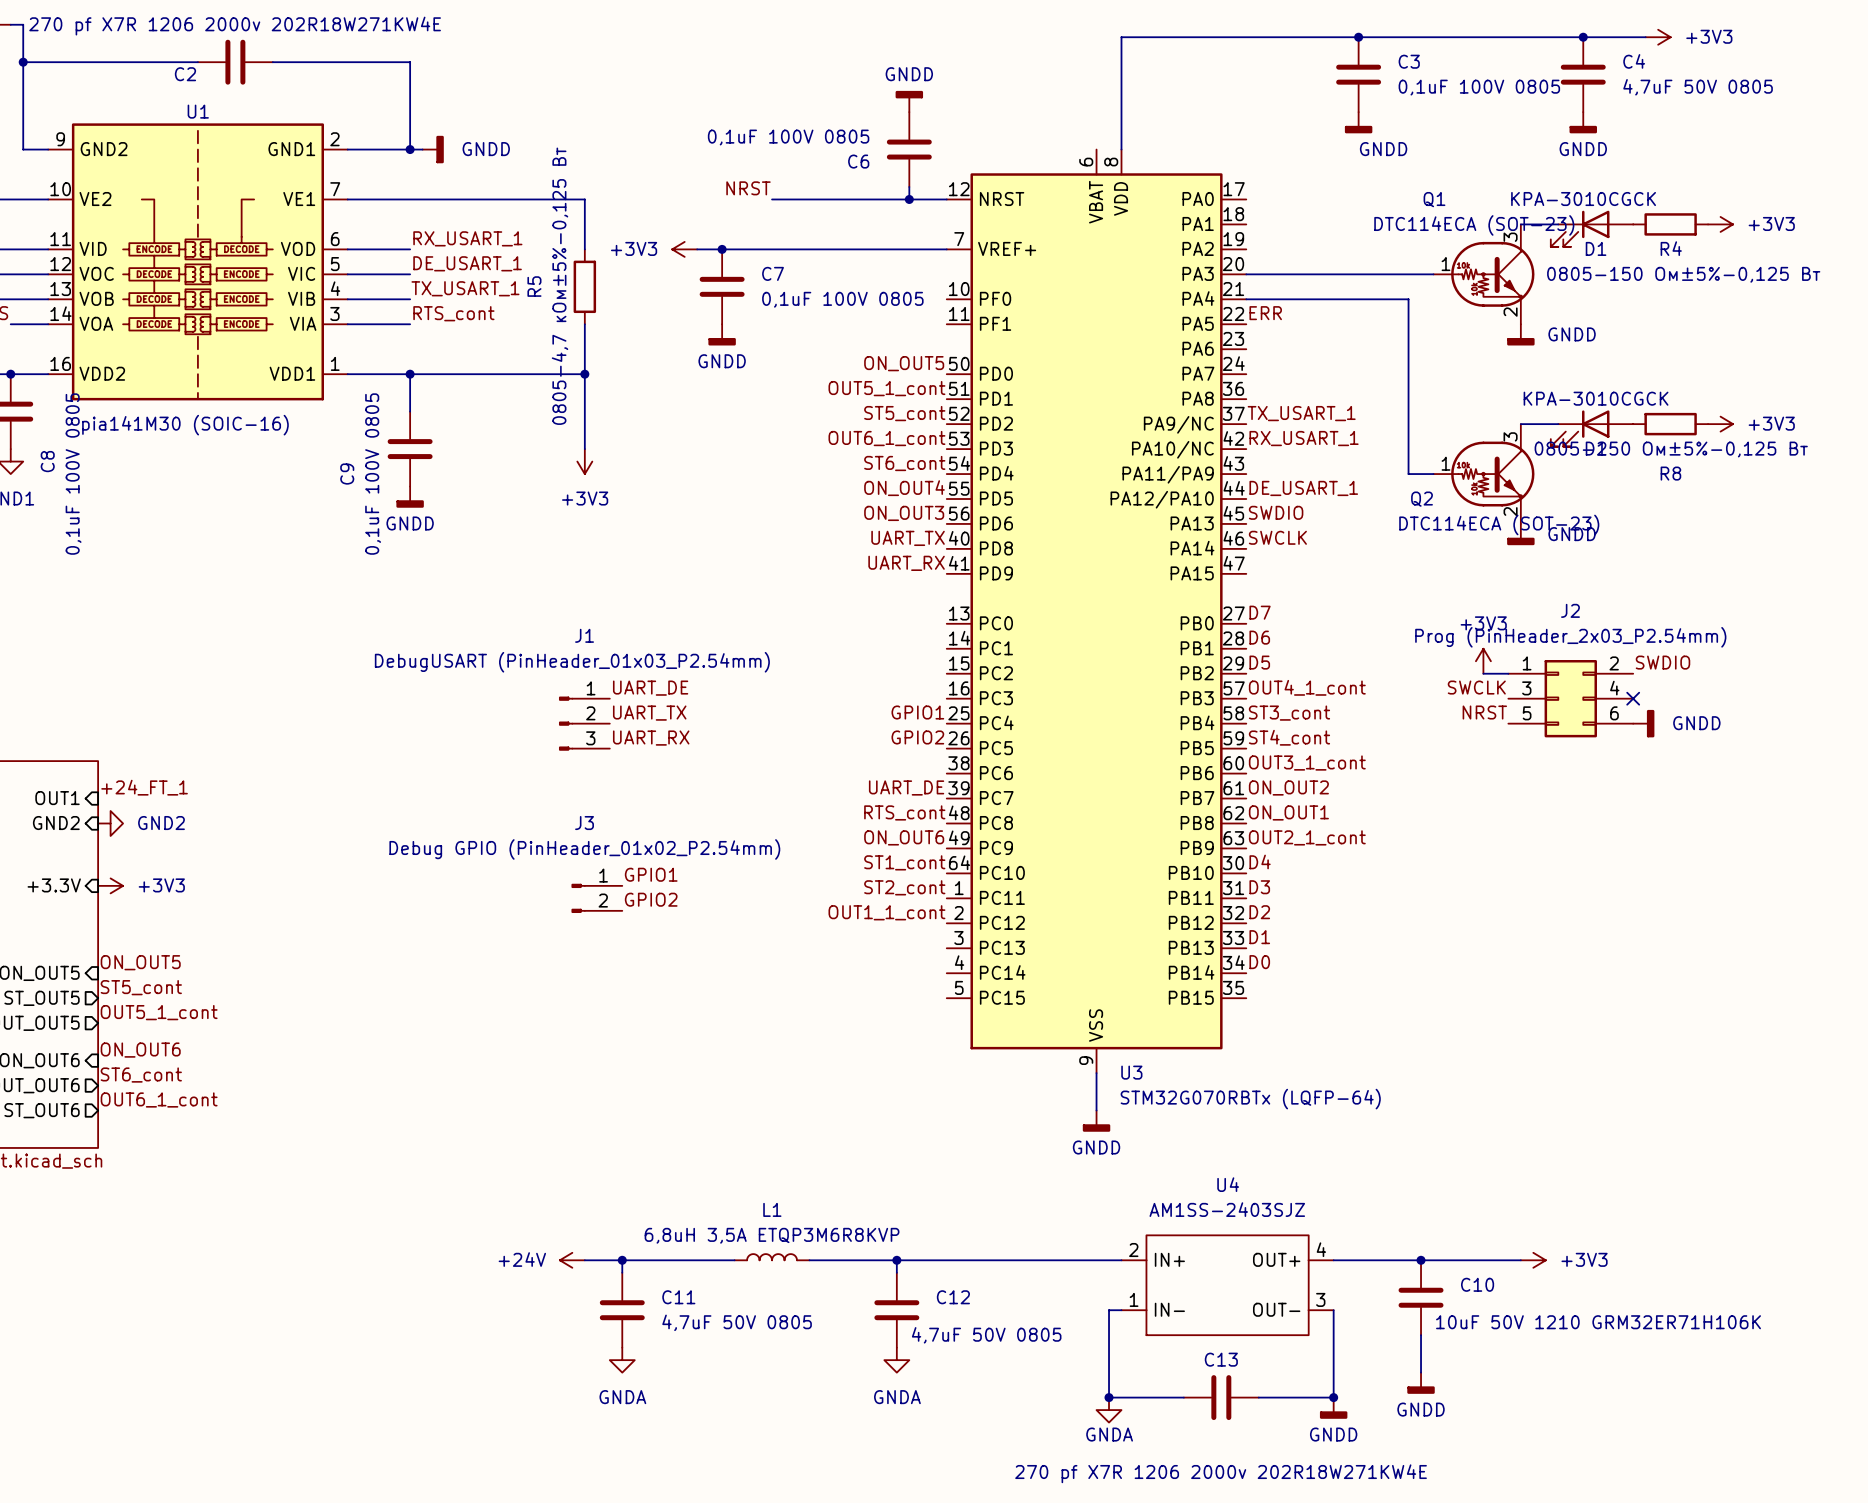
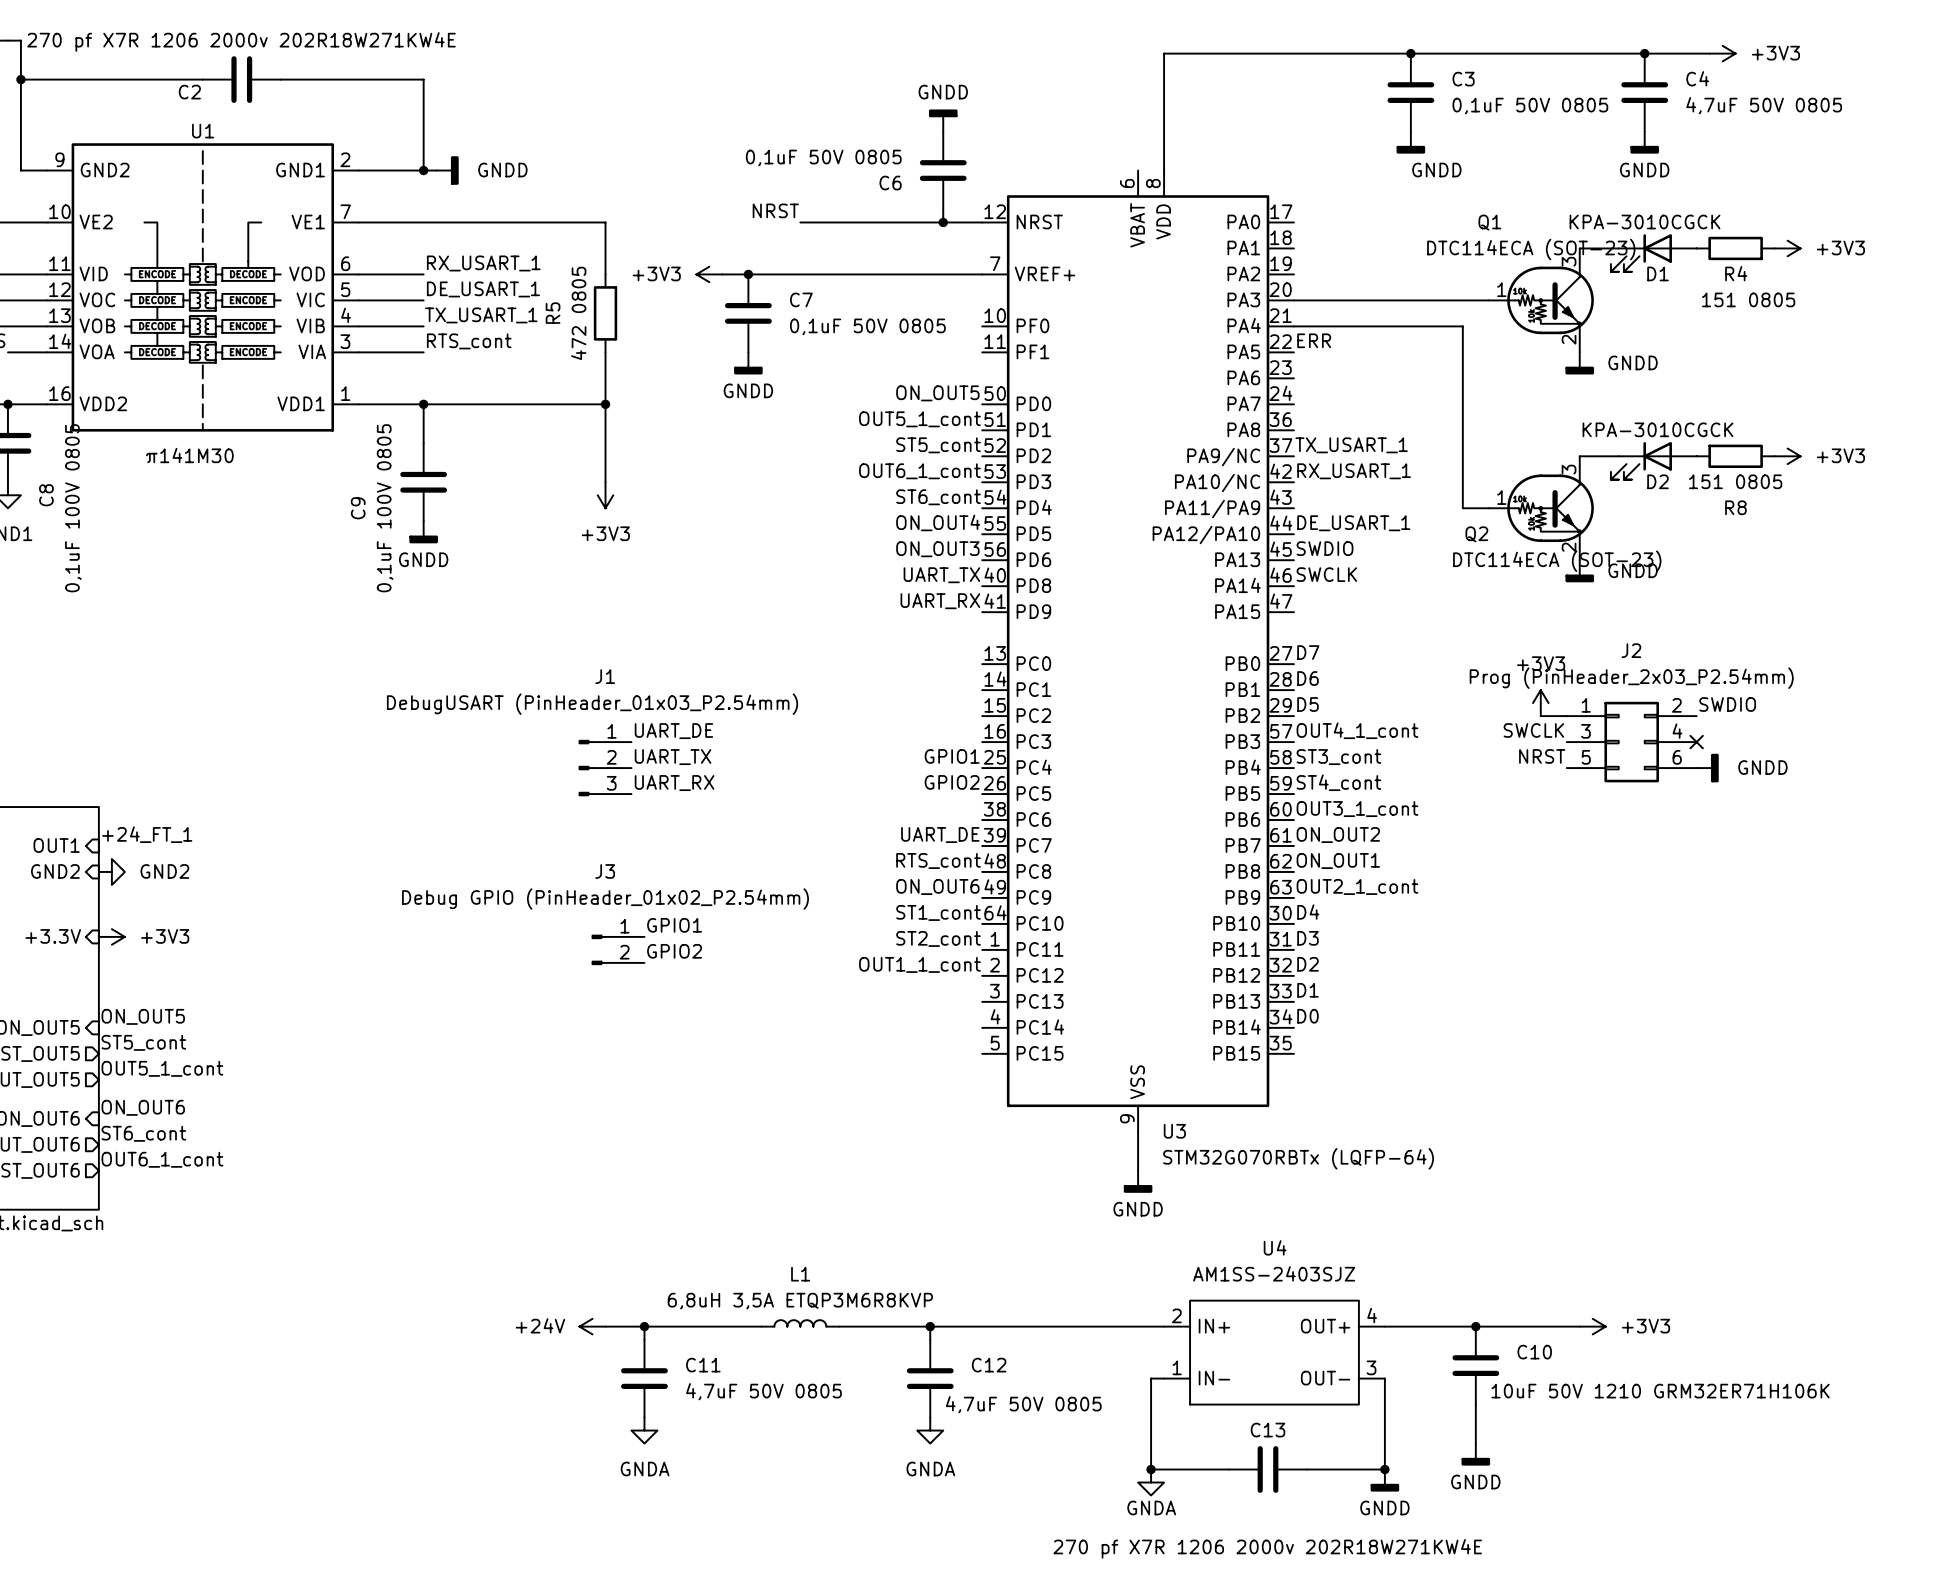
C3 value: 0,1uF 100V 0805 (1479, 87) -> 0,1uF 50V 0805 (1530, 106)
C6 value: 0,1uF 100V 0805 (788, 137) -> 0,1uF 50V 0805 (823, 157)
R4 value: 0805-150 Ом±5%-0,125 Вт (1683, 274) -> 151 0805 (1748, 299)
R5 value: 0805-4,7 кОм±5%-0,125 Вт (560, 286) -> 472 0805 (578, 313)
C7 value: 0,1uF 100V 0805 (842, 299) -> 0,1uF 50V 0805 (867, 326)
U1 value: pia141M30 (SOIC-16) (185, 425) -> π141M30 (189, 455)
R8 value: 0805-150 Ом±5%-0,125 Вт (1671, 449) -> 151 0805 (1735, 481)

